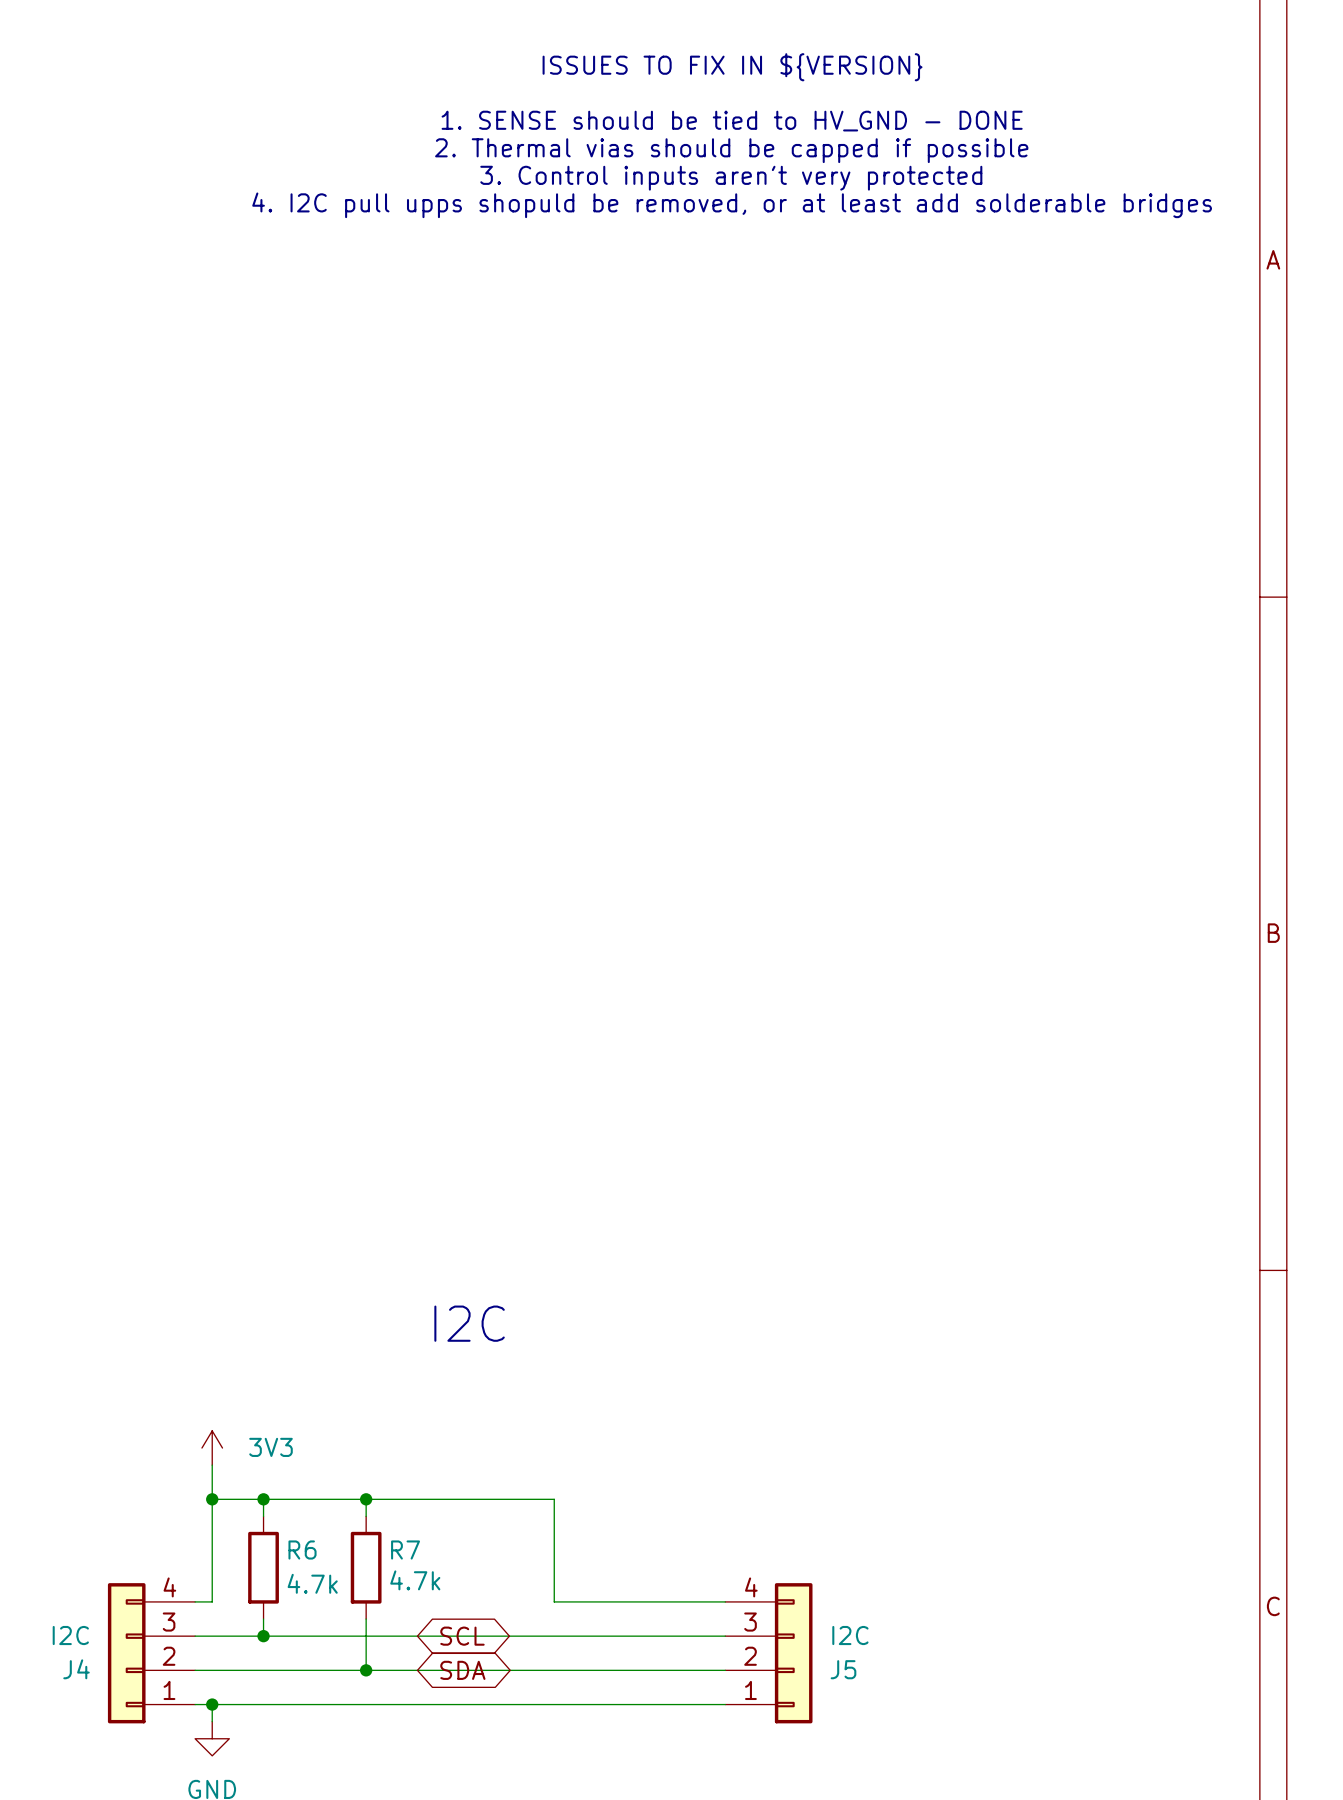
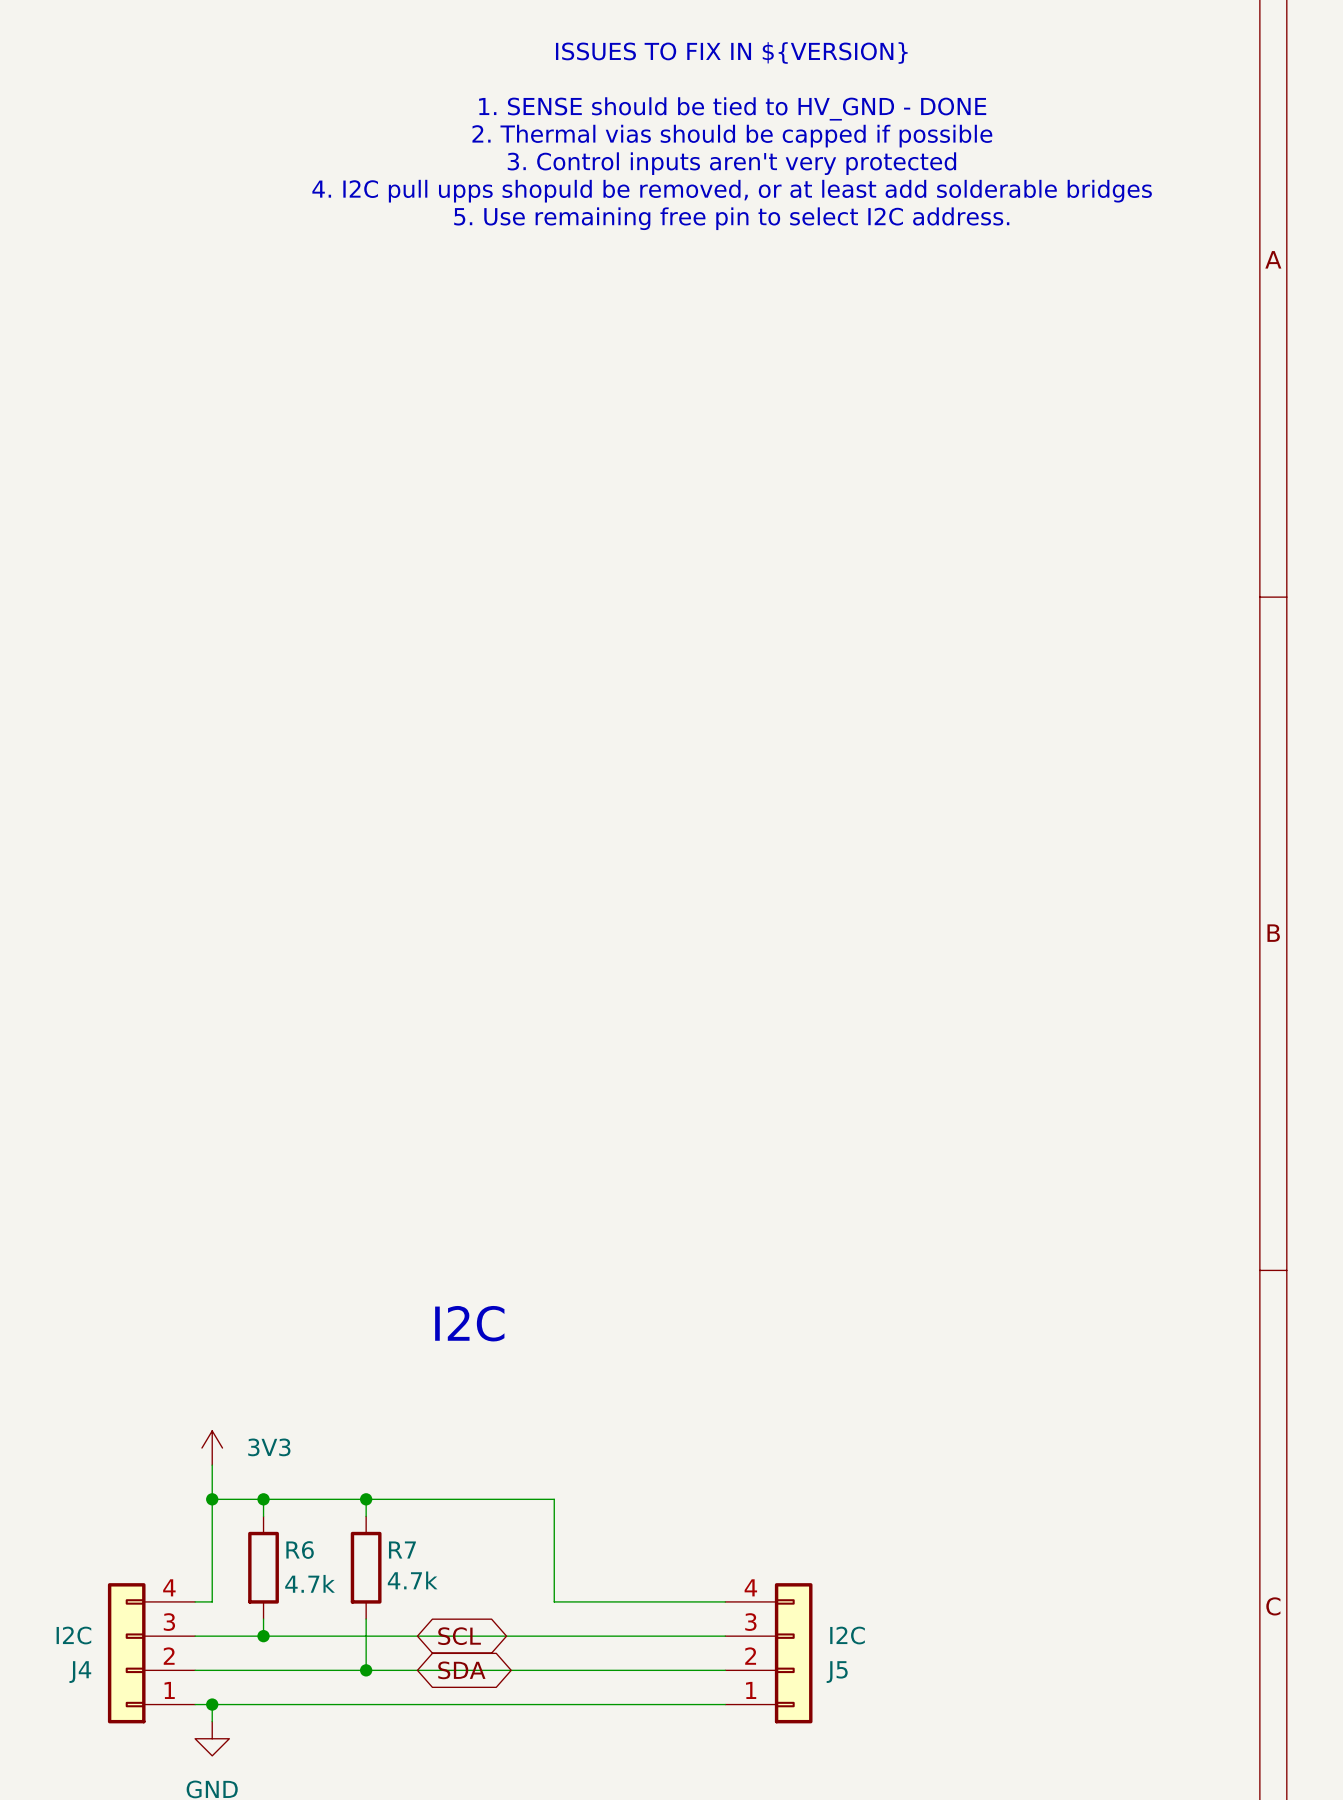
text position: ISSUES TO FIX IN ${VERSION} (732, 67) -> ISSUES TO FIX IN ${VERSION} (731, 52)
text position: 1. SENSE should be tied to HV_GND - DONE (732, 121) -> 1. SENSE should be tied to HV_GND - DONE (732, 108)
text position: 2. Thermal vias should be capped if possible (731, 150) -> 2. Thermal vias should be capped if possible (732, 136)
text position: 3. Control inputs aren't very protected (731, 178) -> 3. Control inputs aren't very protected (731, 163)
text position: 4. I2C pull upps shopuld be removed, or at least add solderable bridges (732, 205) -> 4. I2C pull upps shopuld be removed, or at least add solderable bridges (732, 191)
text: none -> 5. Use remaining free pin to select I2C address. (731, 218)

